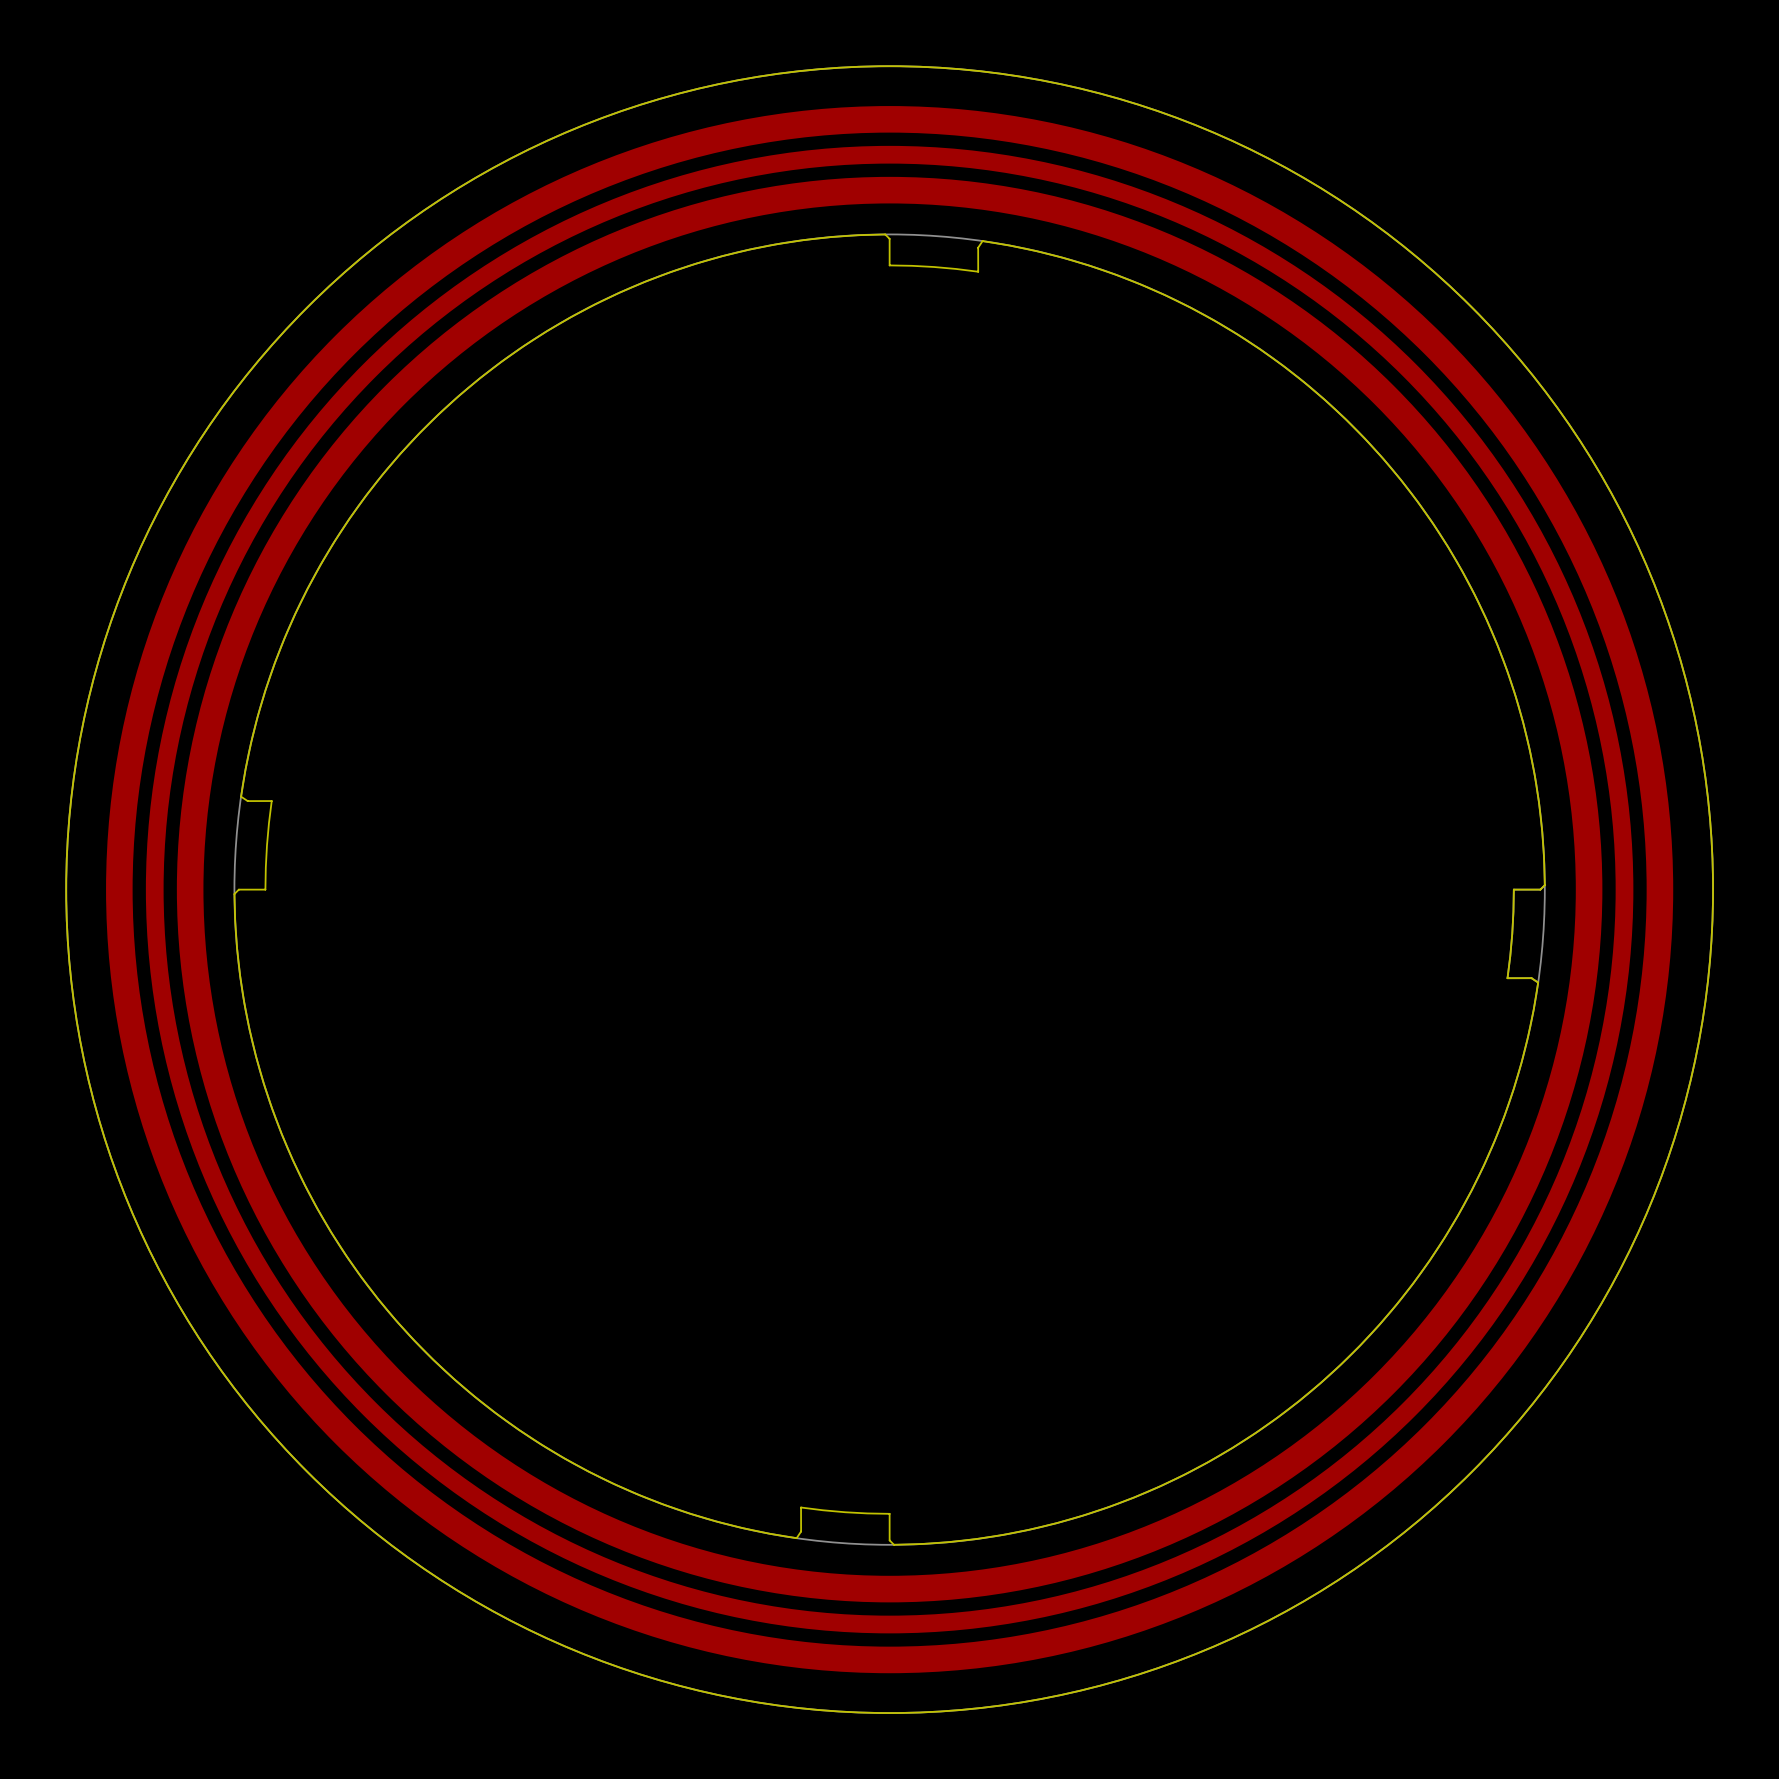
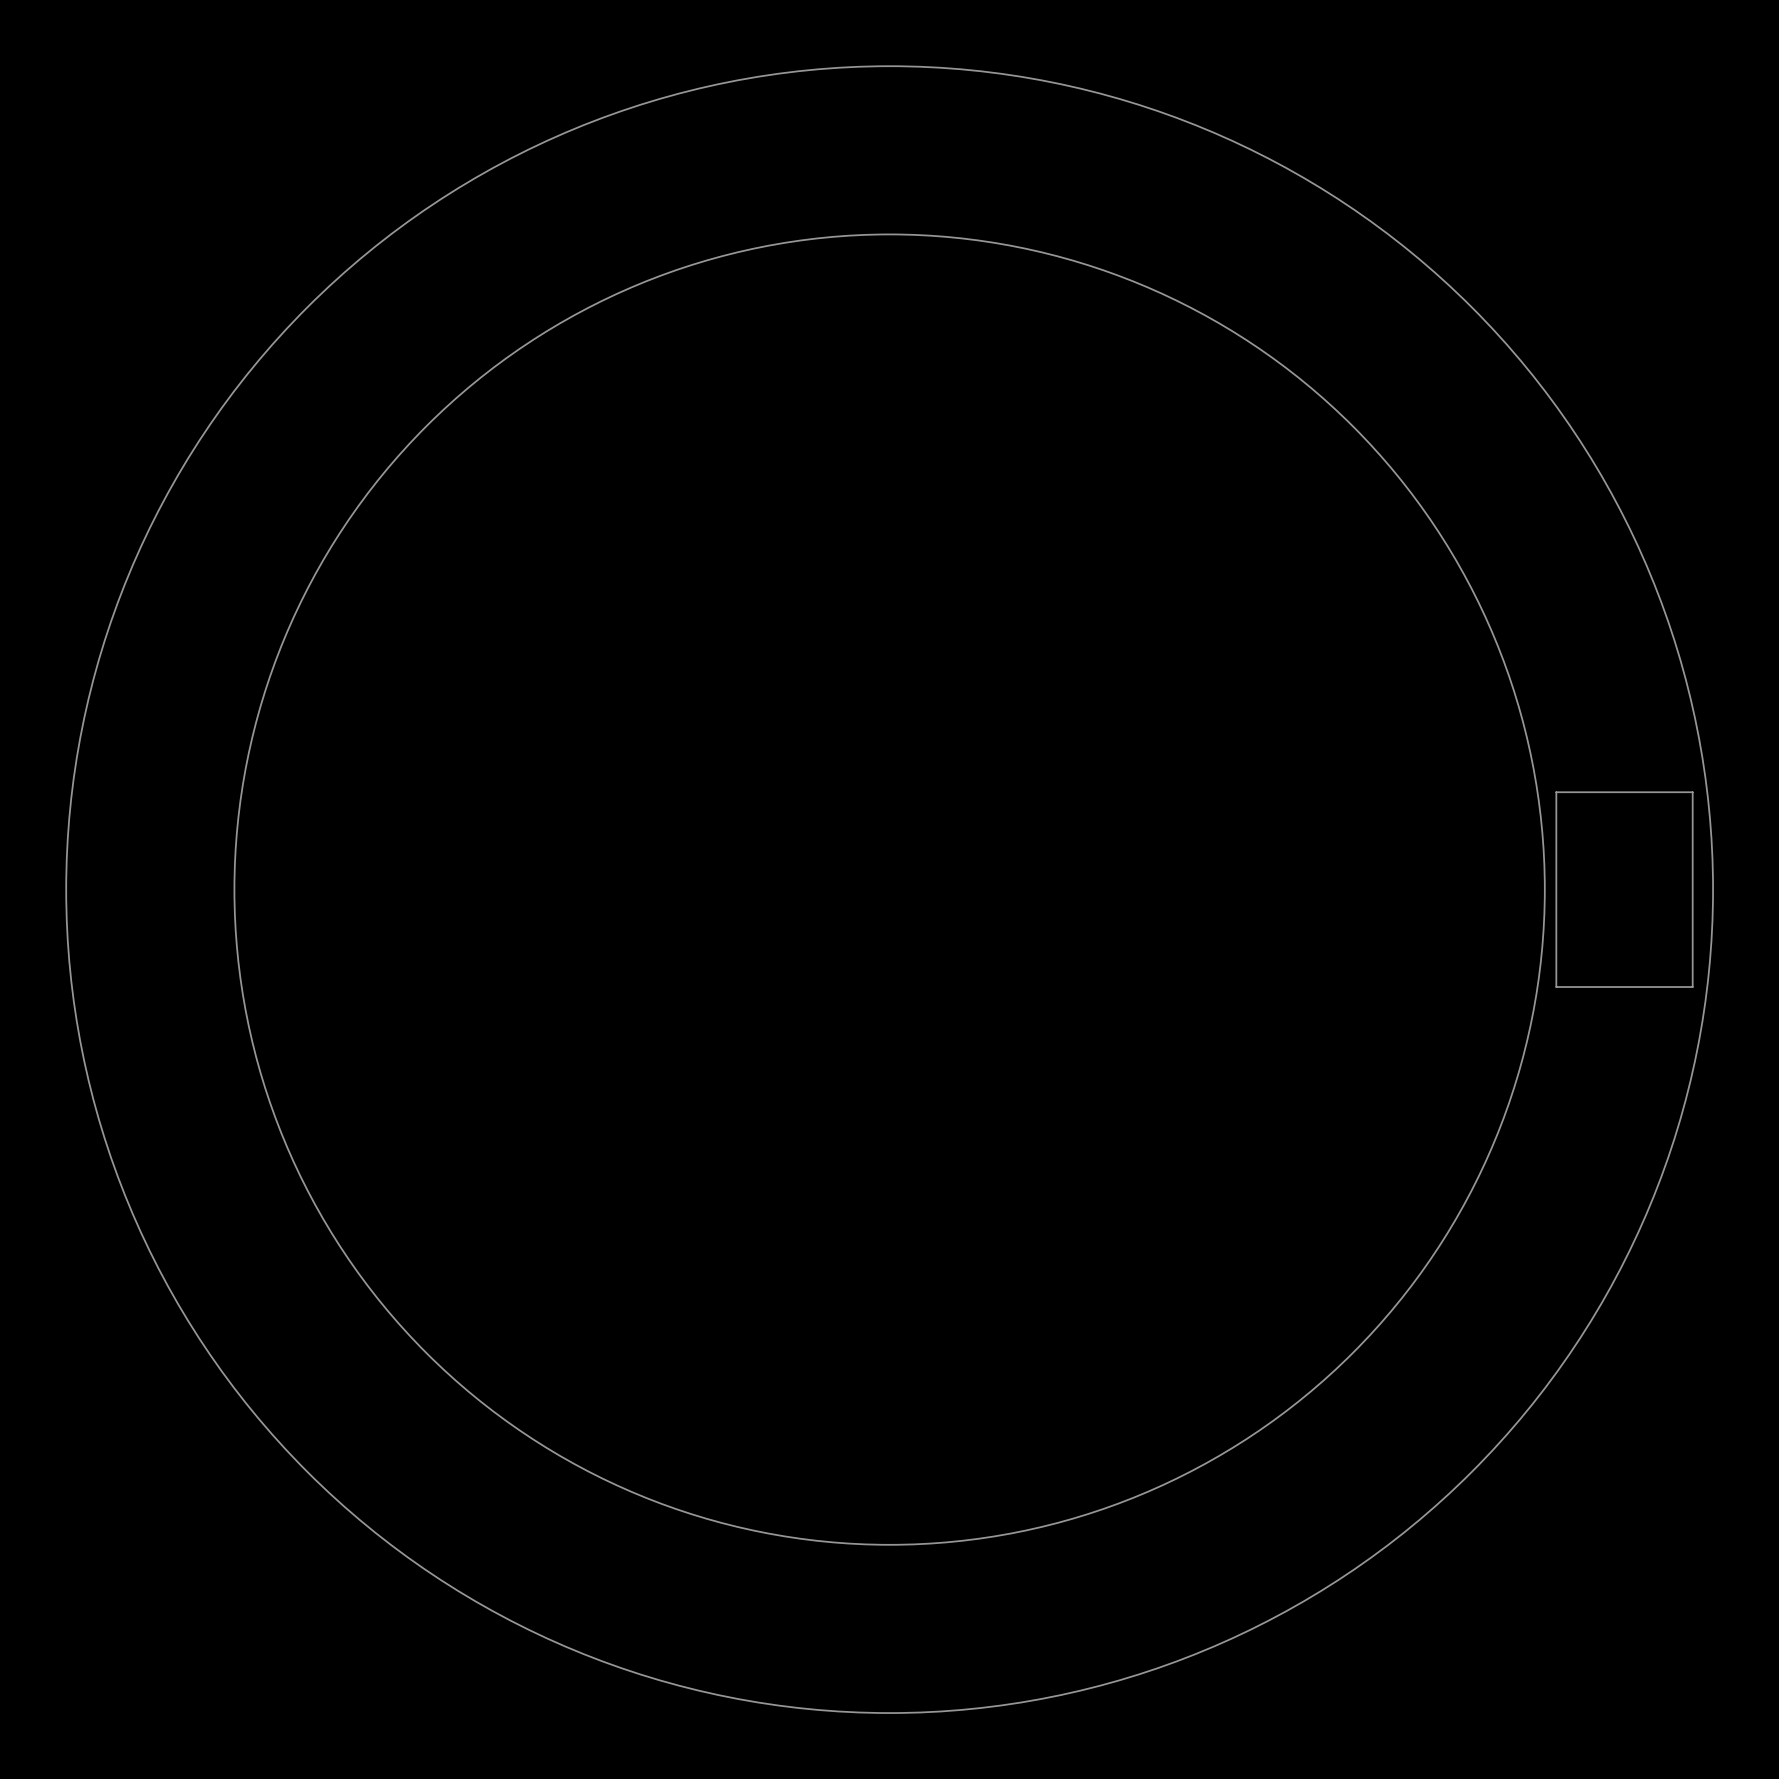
round board edge: [65, 65, 1714, 1714] -> none
drawing: [106, 106, 1674, 1674] -> none
board edge: (885, 234) (889, 238) (889, 265) (934, 267) (978, 271) (978, 247) (982, 241) (1063, 257) (1140, 284) (1190, 307) (1260, 349) (1304, 382) (1345, 419) (1383, 458) (1417, 501) (1461, 570) (1486, 619) (1507, 670) (1529, 749) (1542, 830) (1544, 885) (1540, 889) (1513, 889) (1512, 934) (1507, 978) (1531, 978) (1538, 982) (1521, 1063) (1494, 1140) (1471, 1190) (1444, 1237) (1396, 1304) (1360, 1345) (1299, 1400) (1255, 1433) (1208, 1461) (1134, 1497) (1056, 1523) (1003, 1534) (948, 1542) (894, 1544) (889, 1540) (889, 1513) (845, 1512) (801, 1507) (801, 1531) (796, 1538) (716, 1521) (638, 1494) (588, 1471) (518, 1429) (474, 1396) (433, 1360) (396, 1320) (361, 1277) (331, 1232) (292, 1159) (263, 1082) (249, 1029) (240, 975) (234, 894) (238, 889) (265, 889) (267, 845) (271, 801) (247, 801) (241, 796) (257, 716) (284, 638) (307, 588) (349, 518) (382, 474) (419, 433) (458, 396) (523, 345) (570, 317) (619, 292) (670, 272) (749, 249) (830, 237) (885, 234) -> none
line: none -> (1556, 792) (1692, 792) (1692, 987) (1556, 987) (1556, 792)

